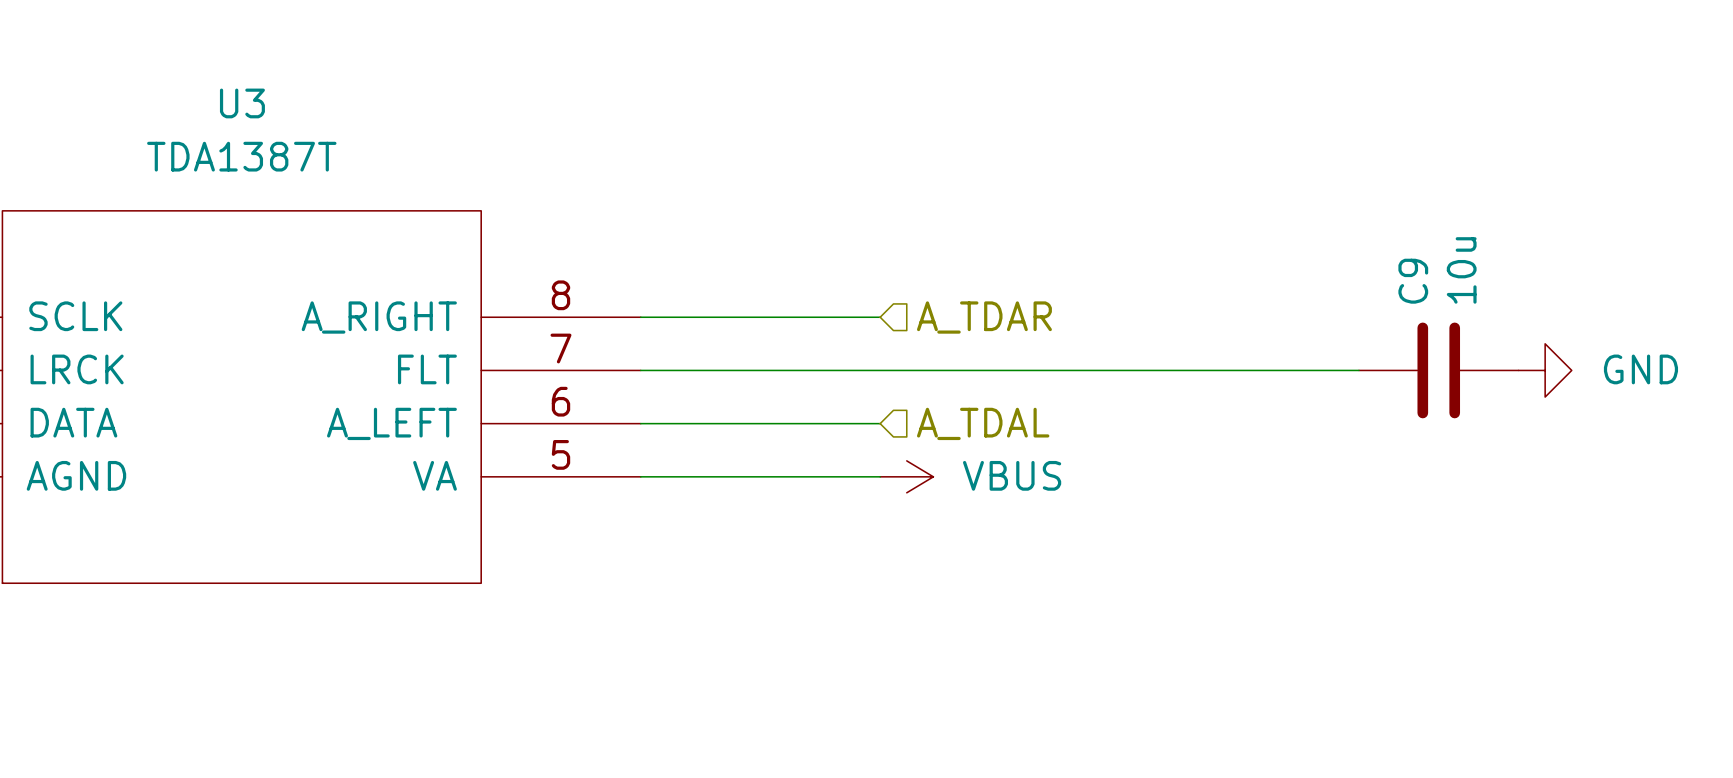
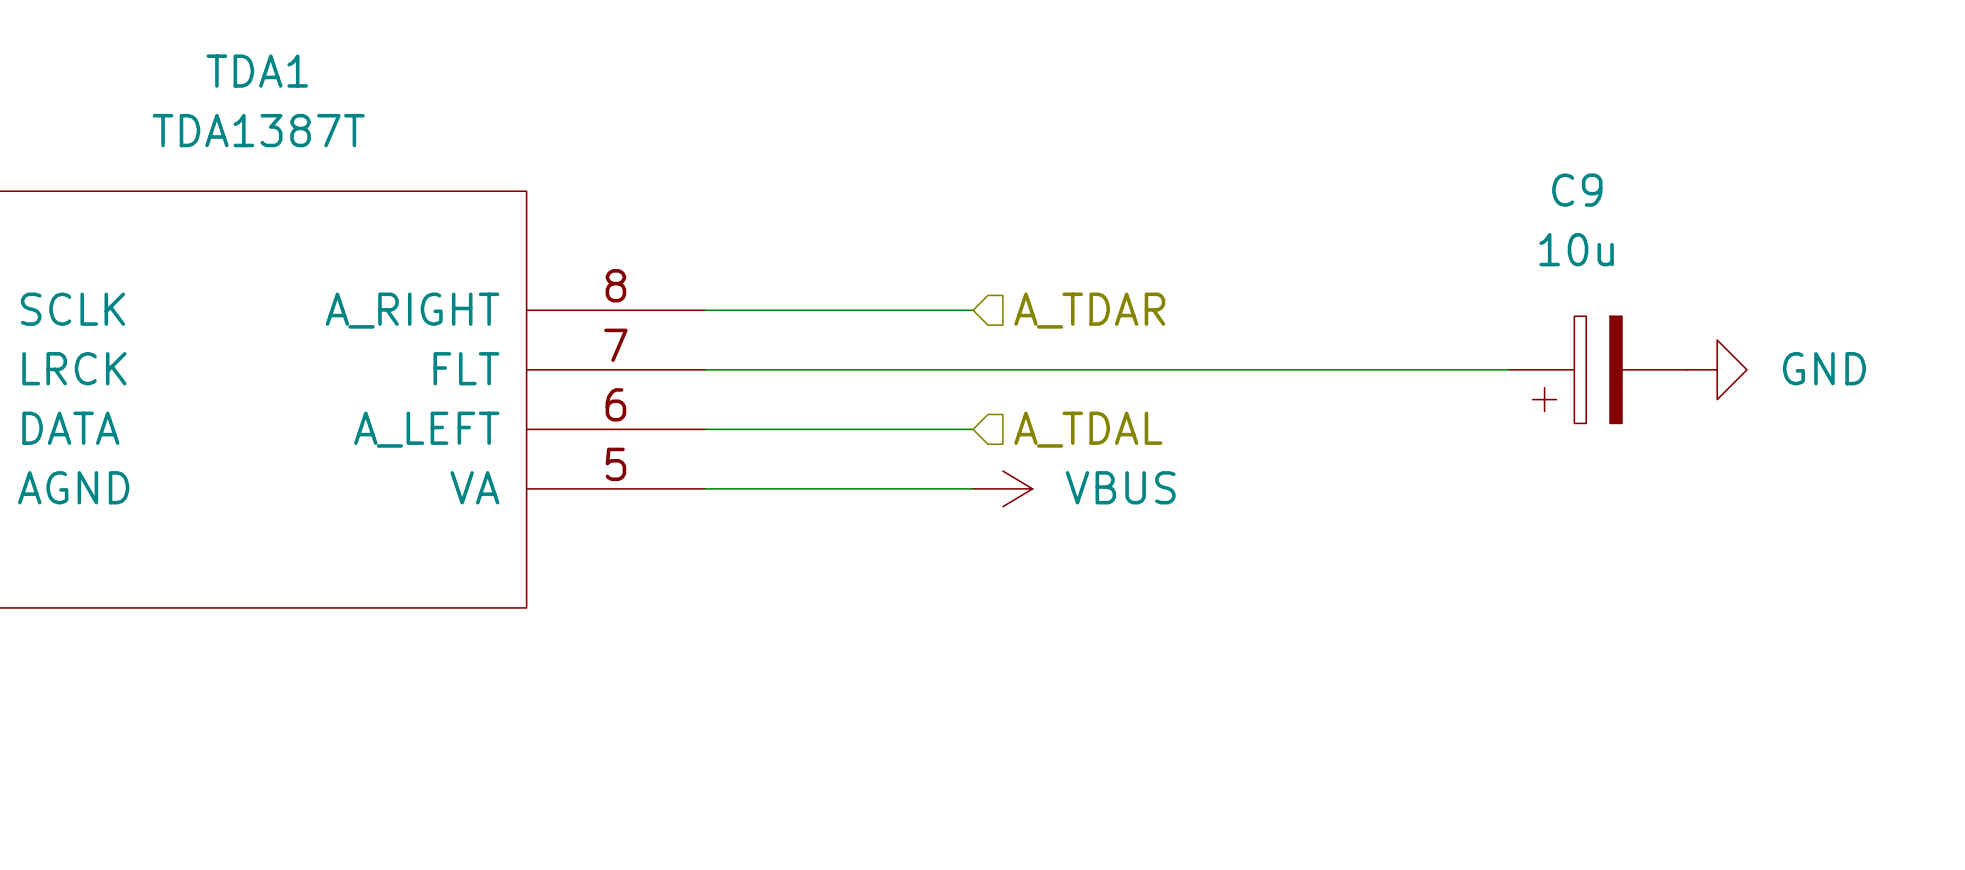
U3 name: U3 (242, 103) -> TDA1 (257, 71)
C9 value position: 10u (1461, 270) -> 10u (1576, 249)
C9 name position: C9 (1413, 281) -> C9 (1577, 190)
C9 symbol: [1358, 322, 1519, 419] -> [1508, 316, 1688, 424]

